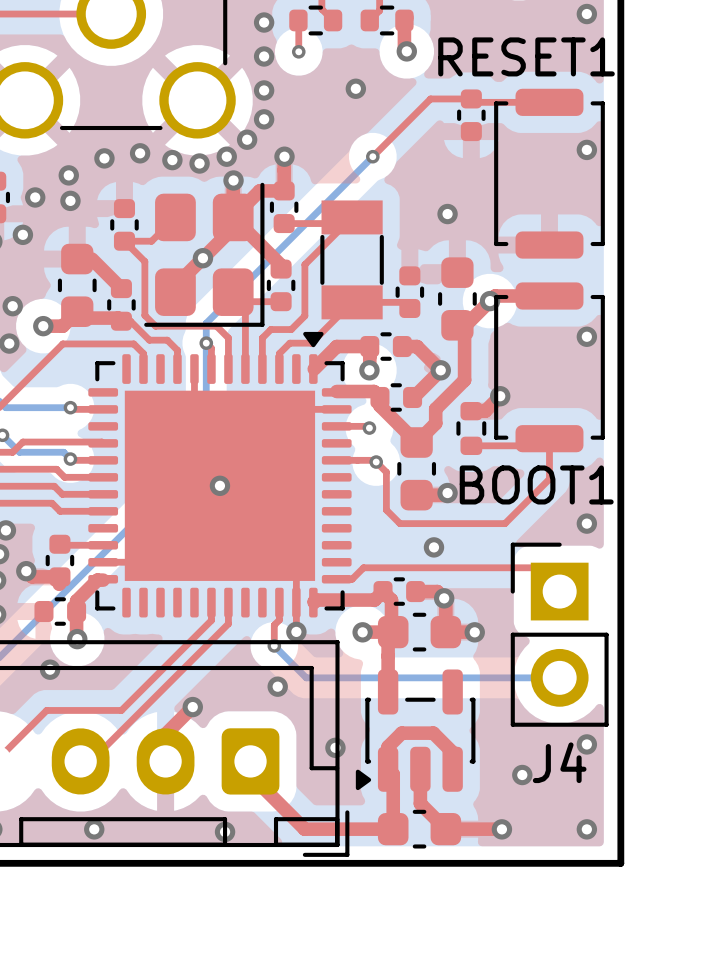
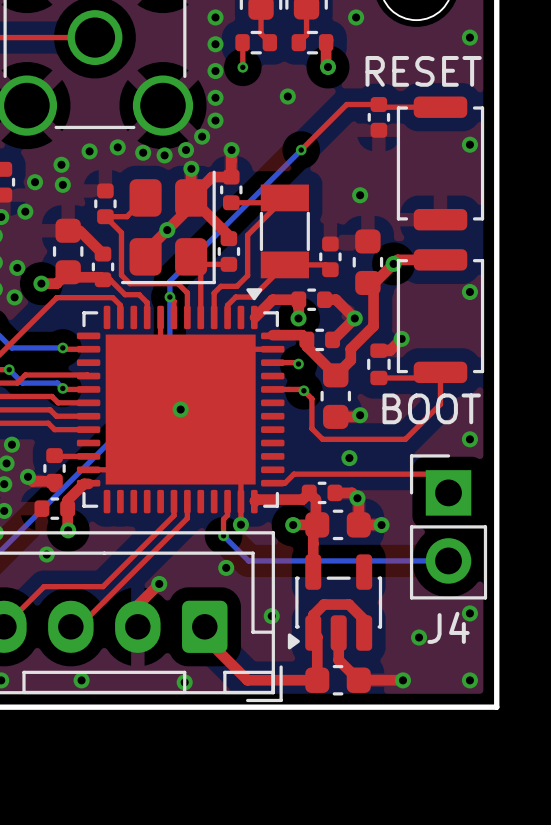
RESET1 name: RESET1 (526, 56) -> RESET (423, 71)
BOOT1 name: BOOT1 (536, 484) -> BOOT (431, 408)

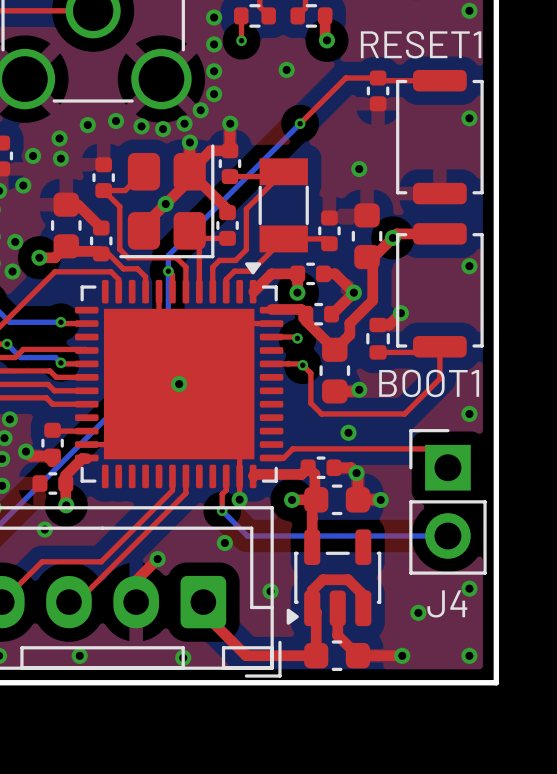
RESET name: RESET (423, 71) -> RESET1 (421, 44)
BOOT name: BOOT (431, 408) -> BOOT1 (429, 383)

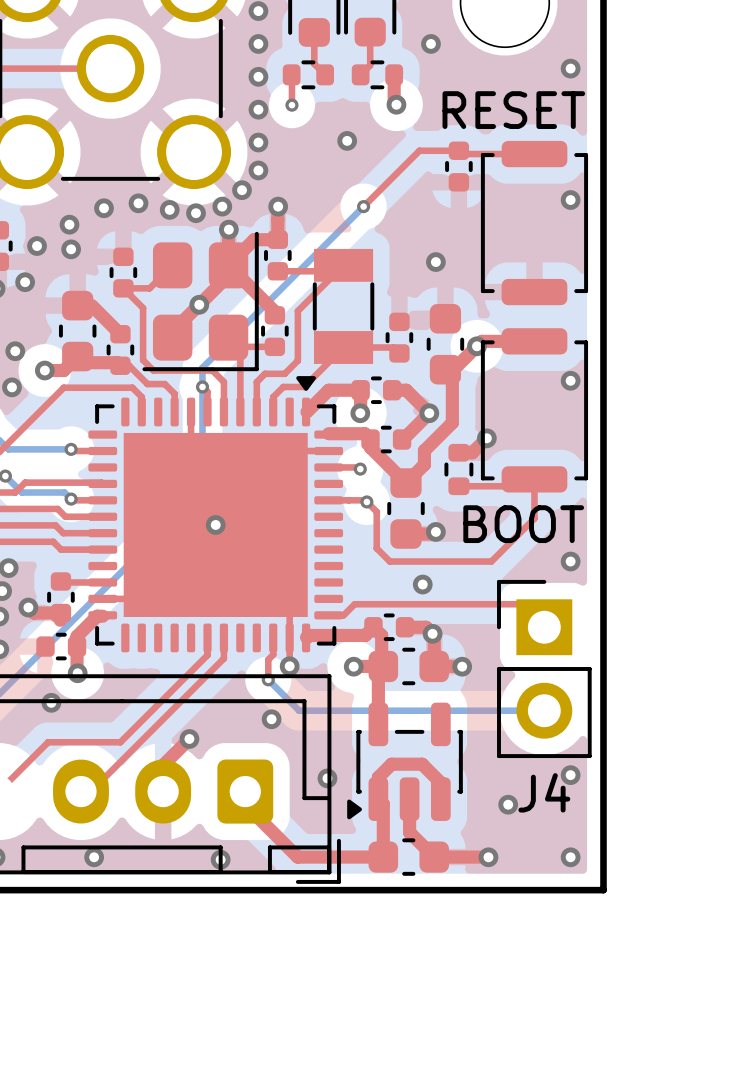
RESET1 name: RESET1 (421, 44) -> RESET (513, 110)
BOOT1 name: BOOT1 (429, 383) -> BOOT (523, 524)

